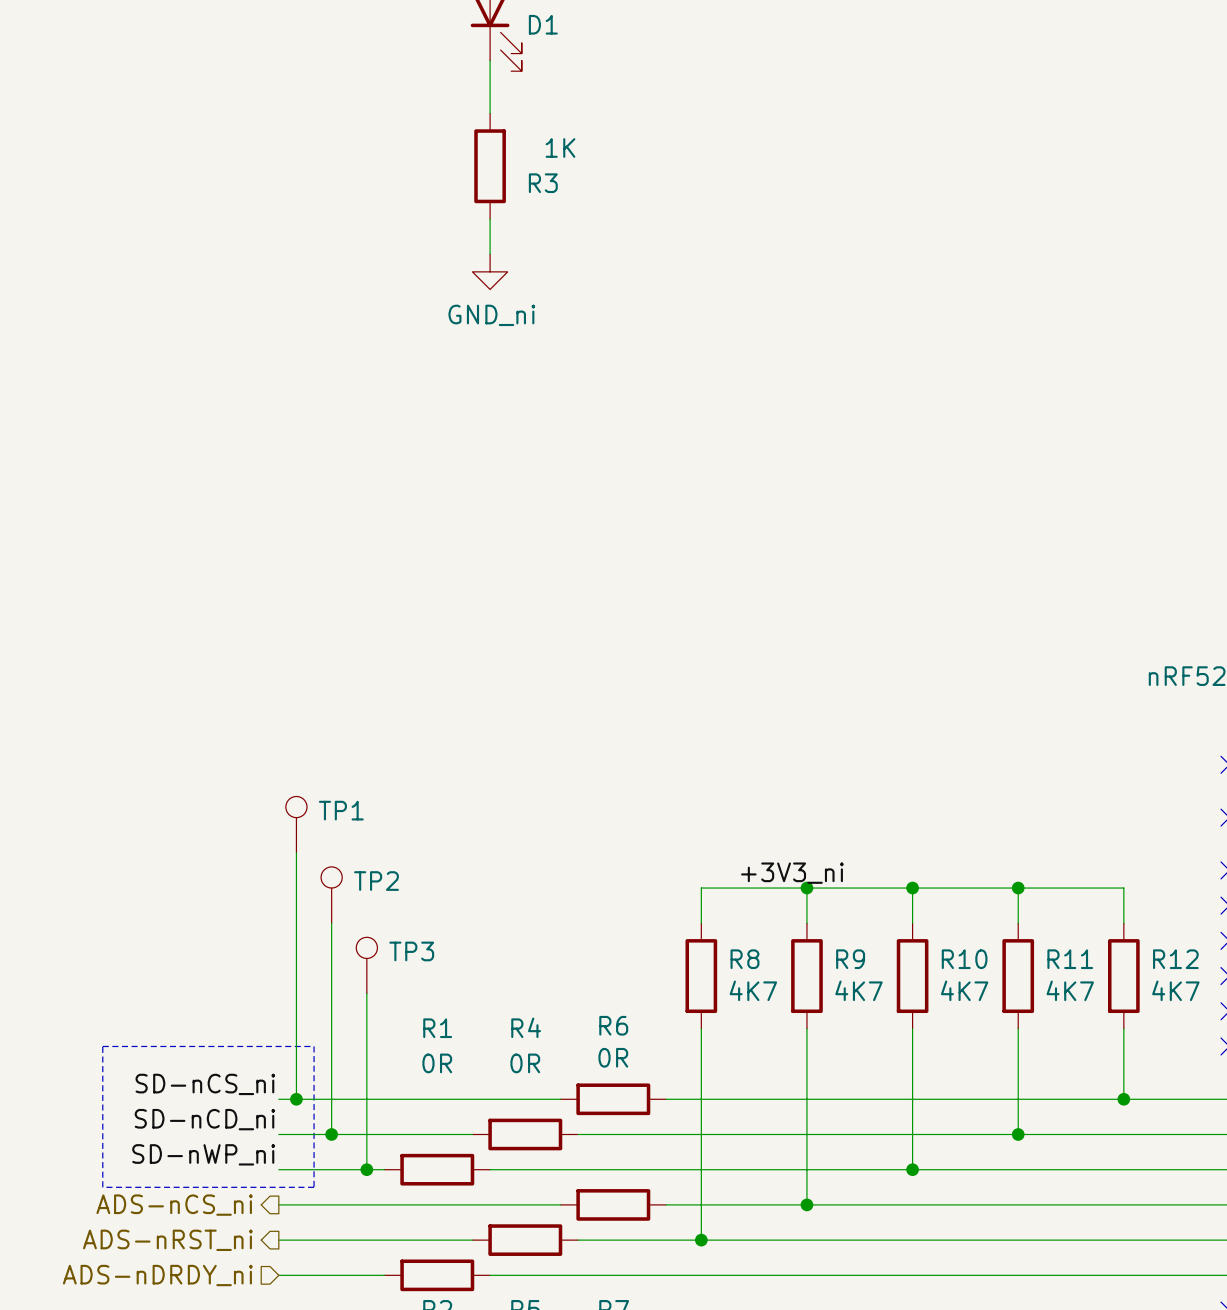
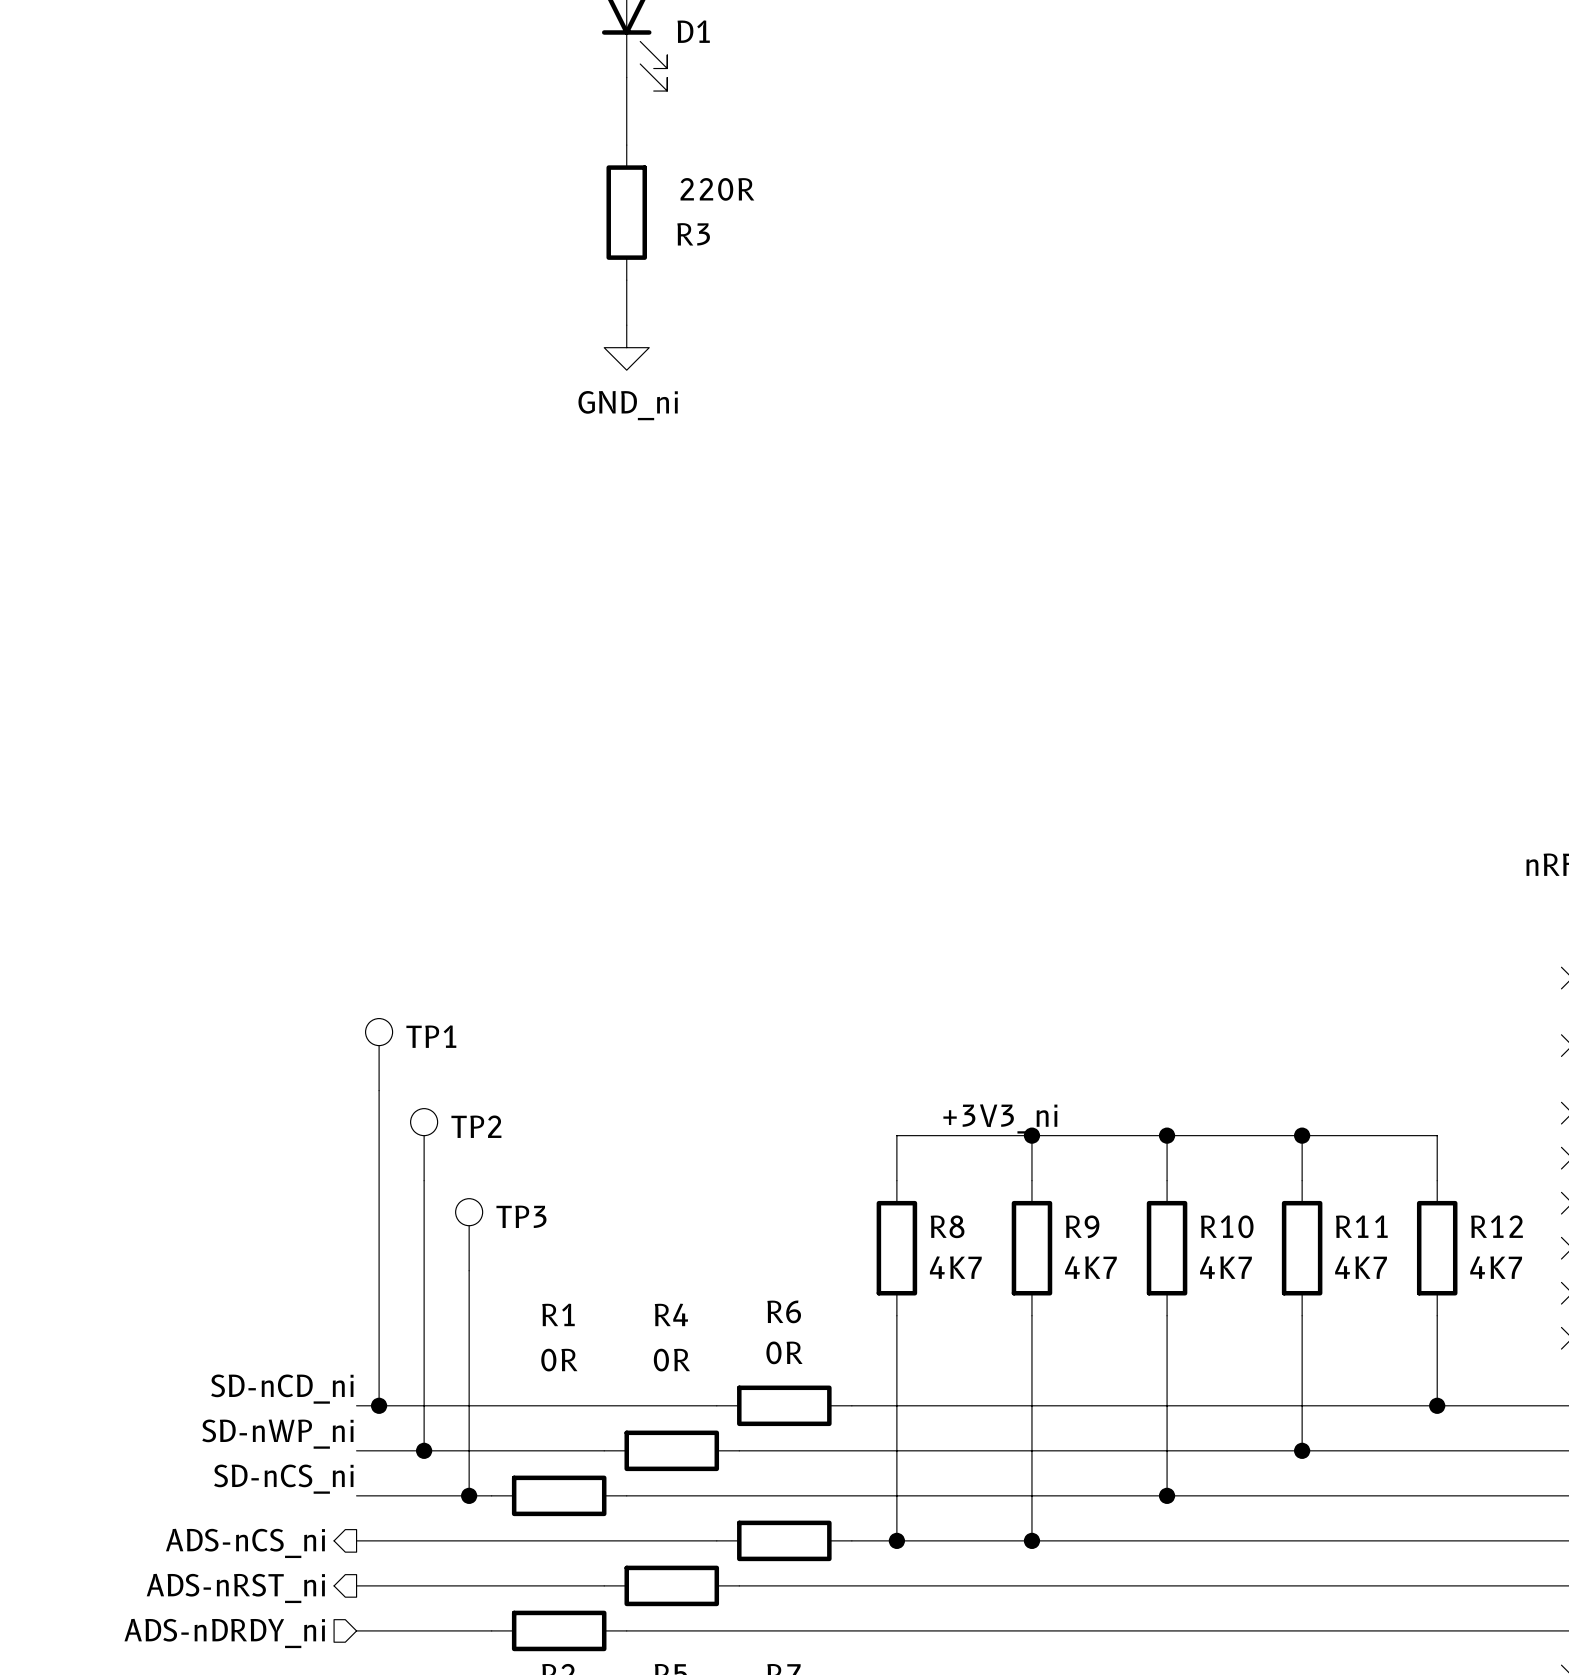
R3 value: 1K (560, 147) -> 220R (717, 189)
line: (102, 1046) (314, 1046) (314, 1187) (102, 1187) (102, 1046) -> none
label: SD-nCS_ni (205, 1084) -> SD-nCD_ni (282, 1389)
label: SD-nCD_ni (204, 1119) -> SD-nWP_ni (277, 1434)
label: SD-nWP_ni (203, 1154) -> SD-nCS_ni (283, 1479)
wire: (701, 1204) (701, 1240) -> none
junction position: (701, 1240) -> (896, 1540)

